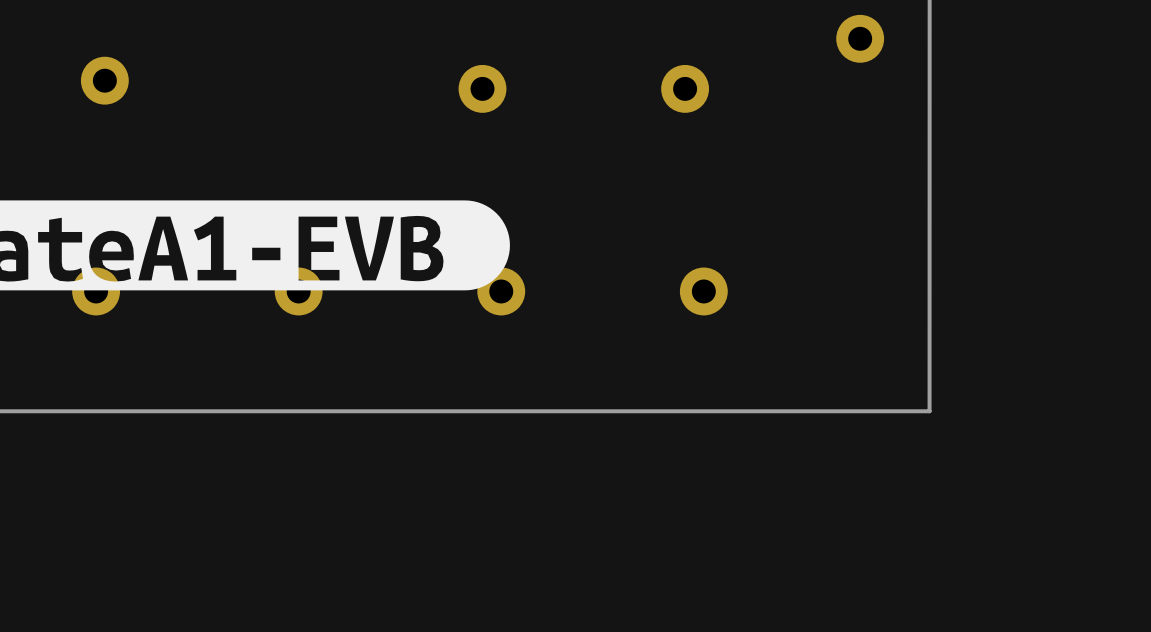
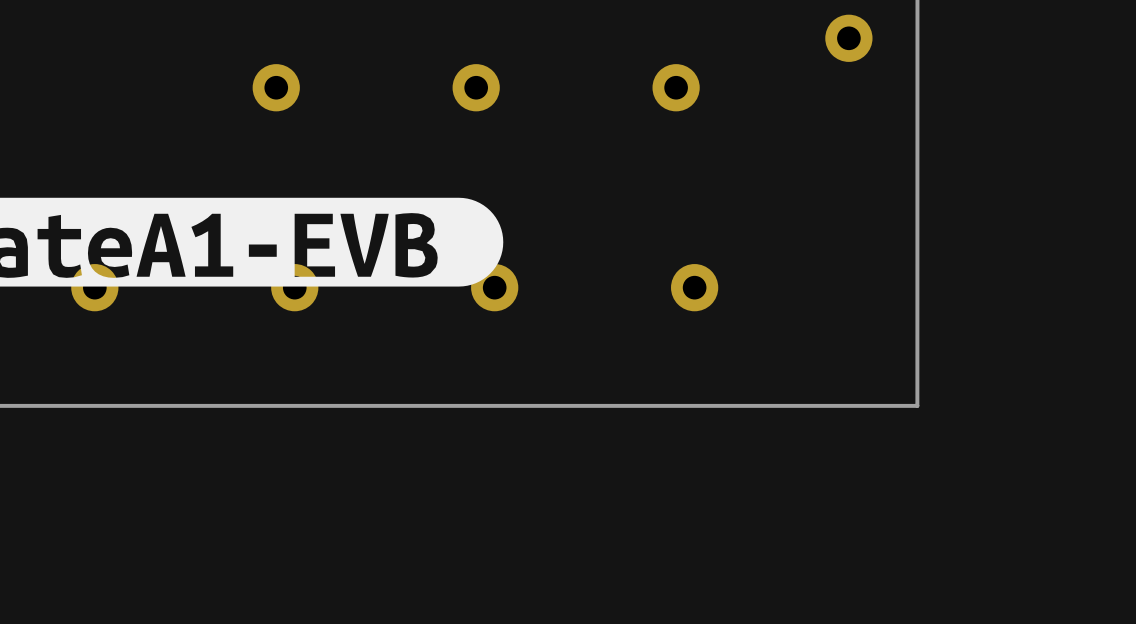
via: (104, 80) -> none
via: none -> (276, 87)

